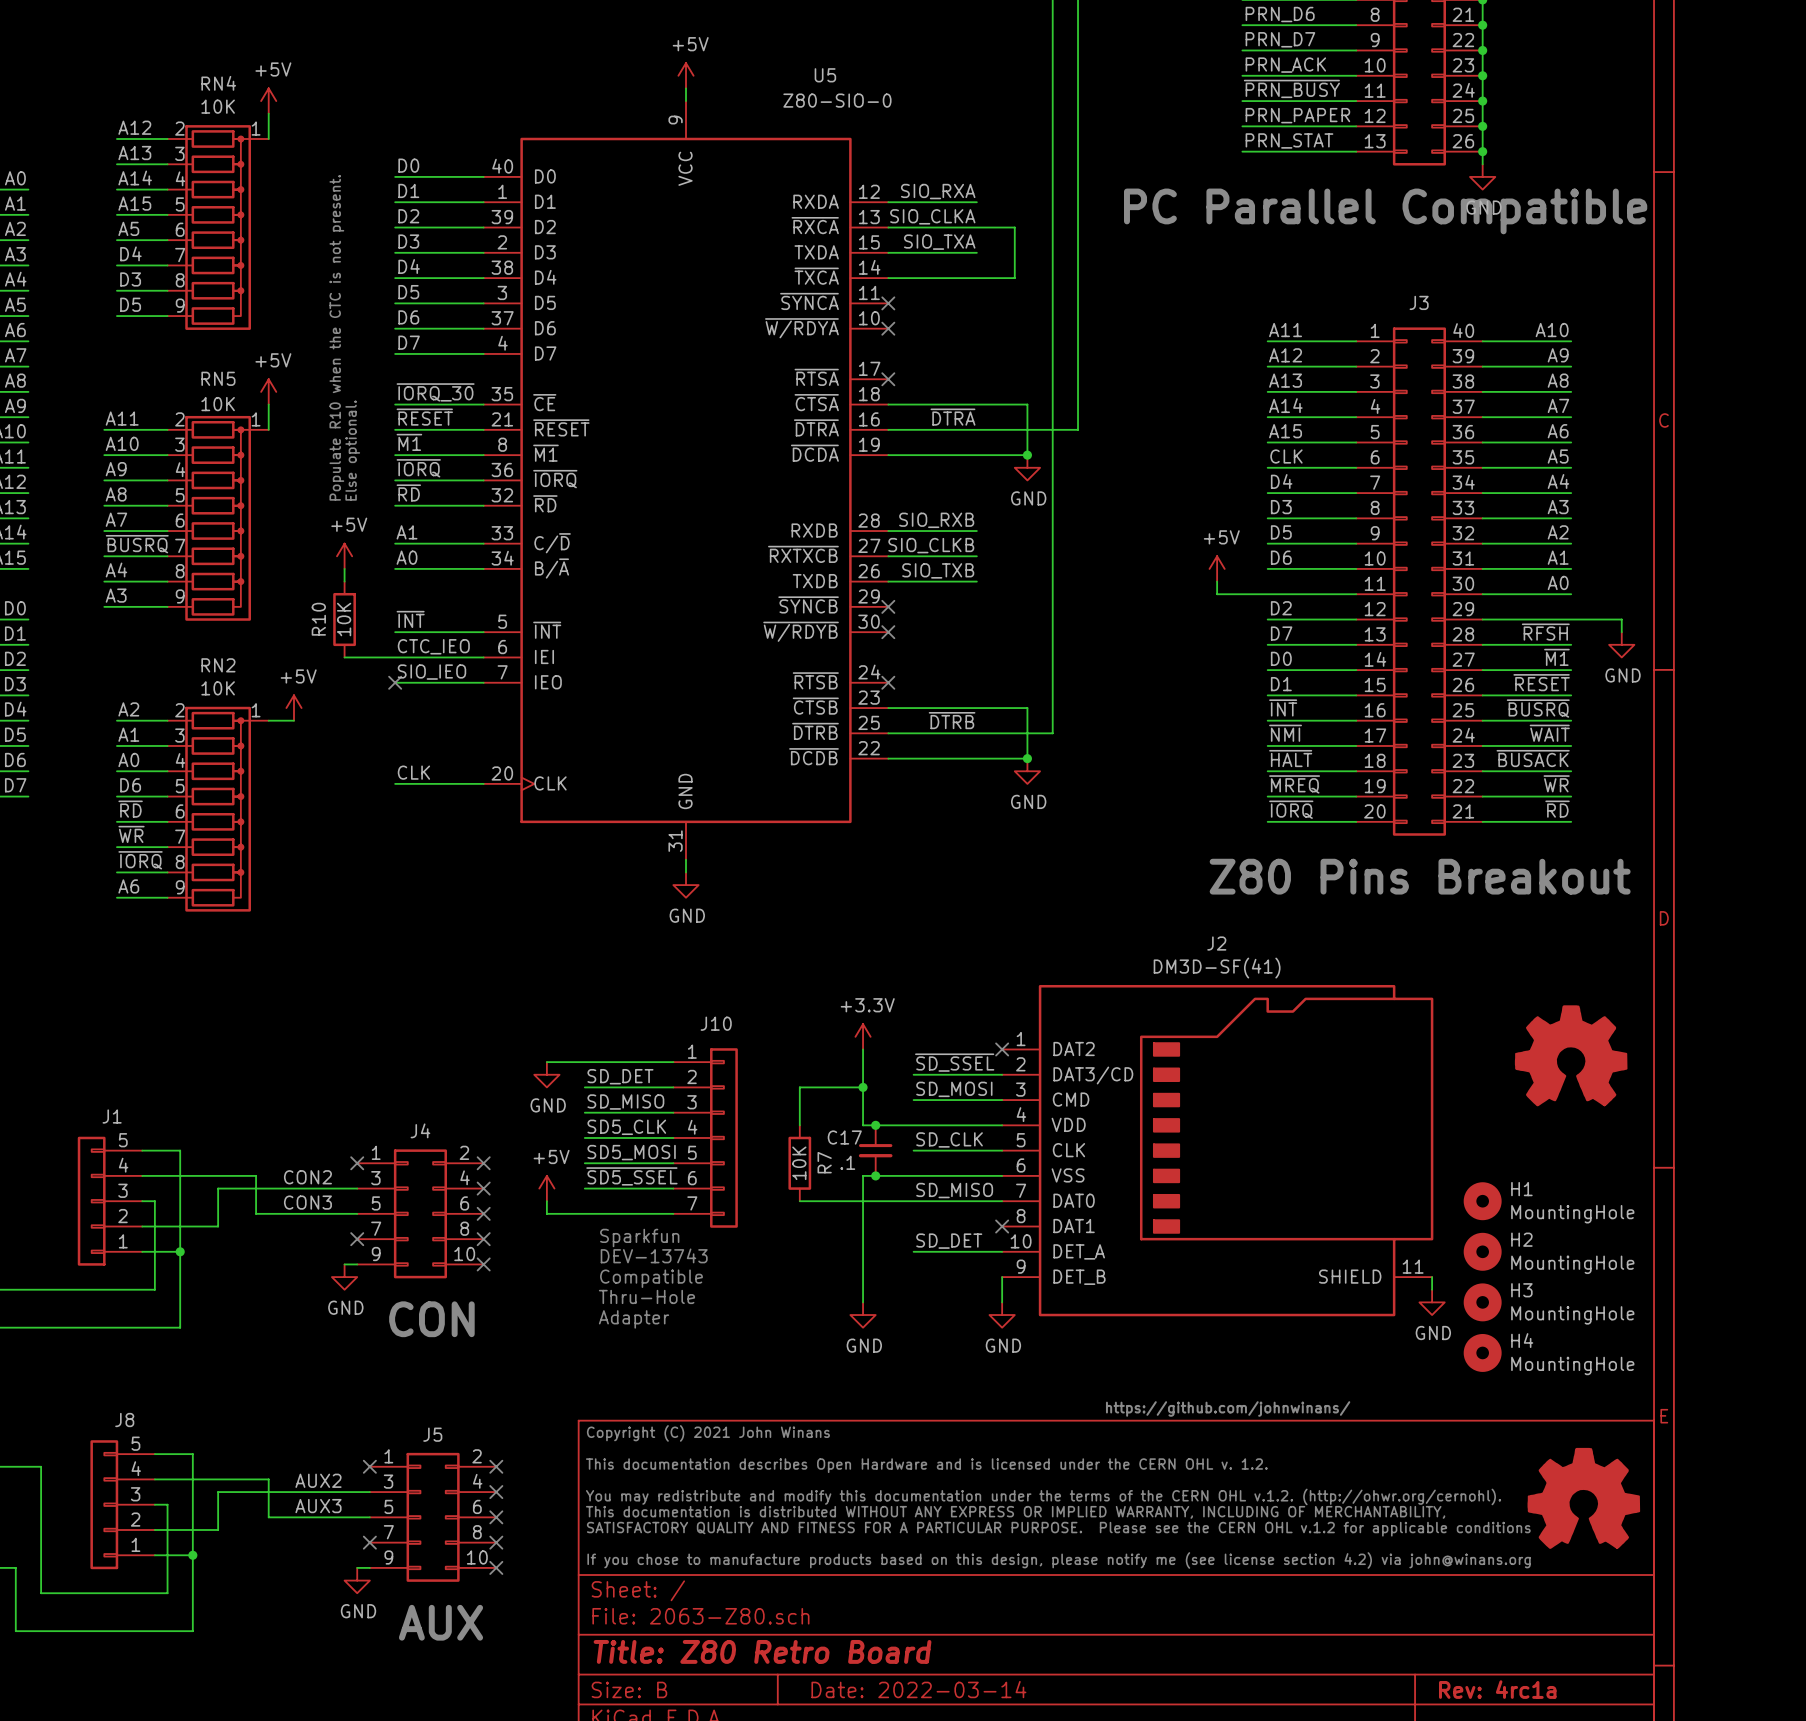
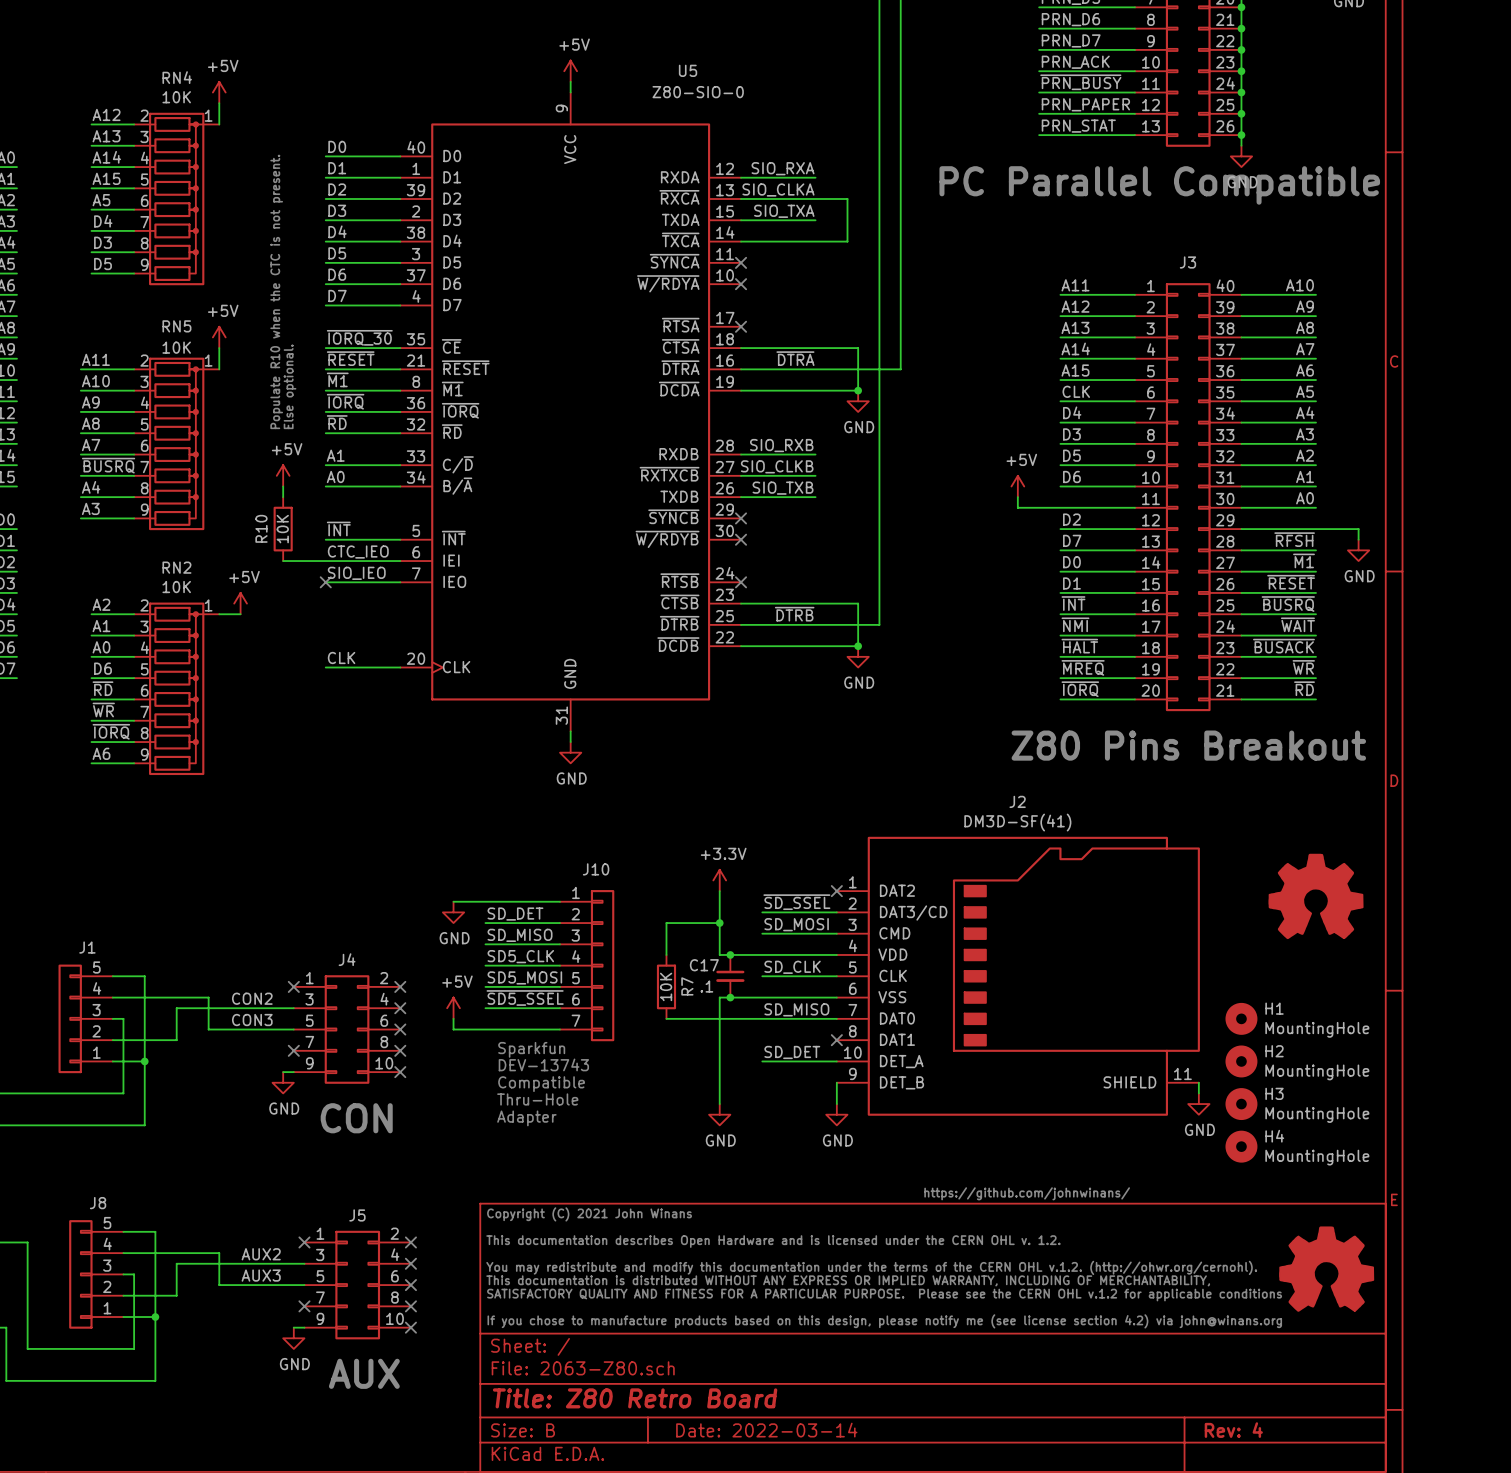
title block: Rev: 4rc1a (1497, 1689) -> Rev: 4 (1233, 1430)

